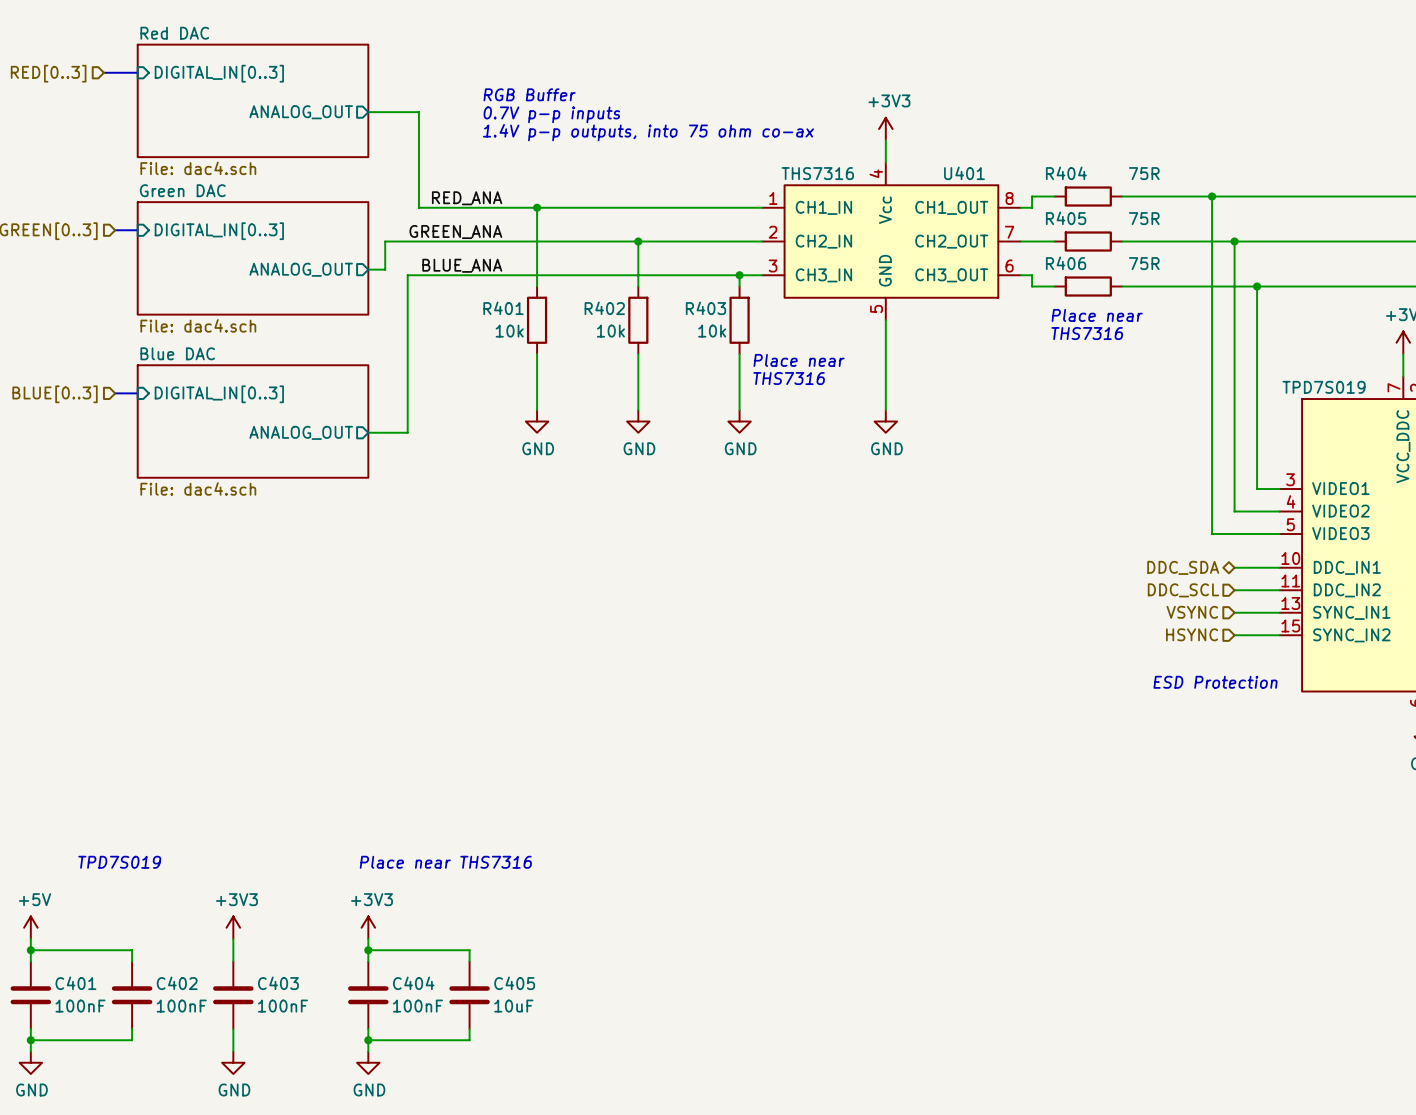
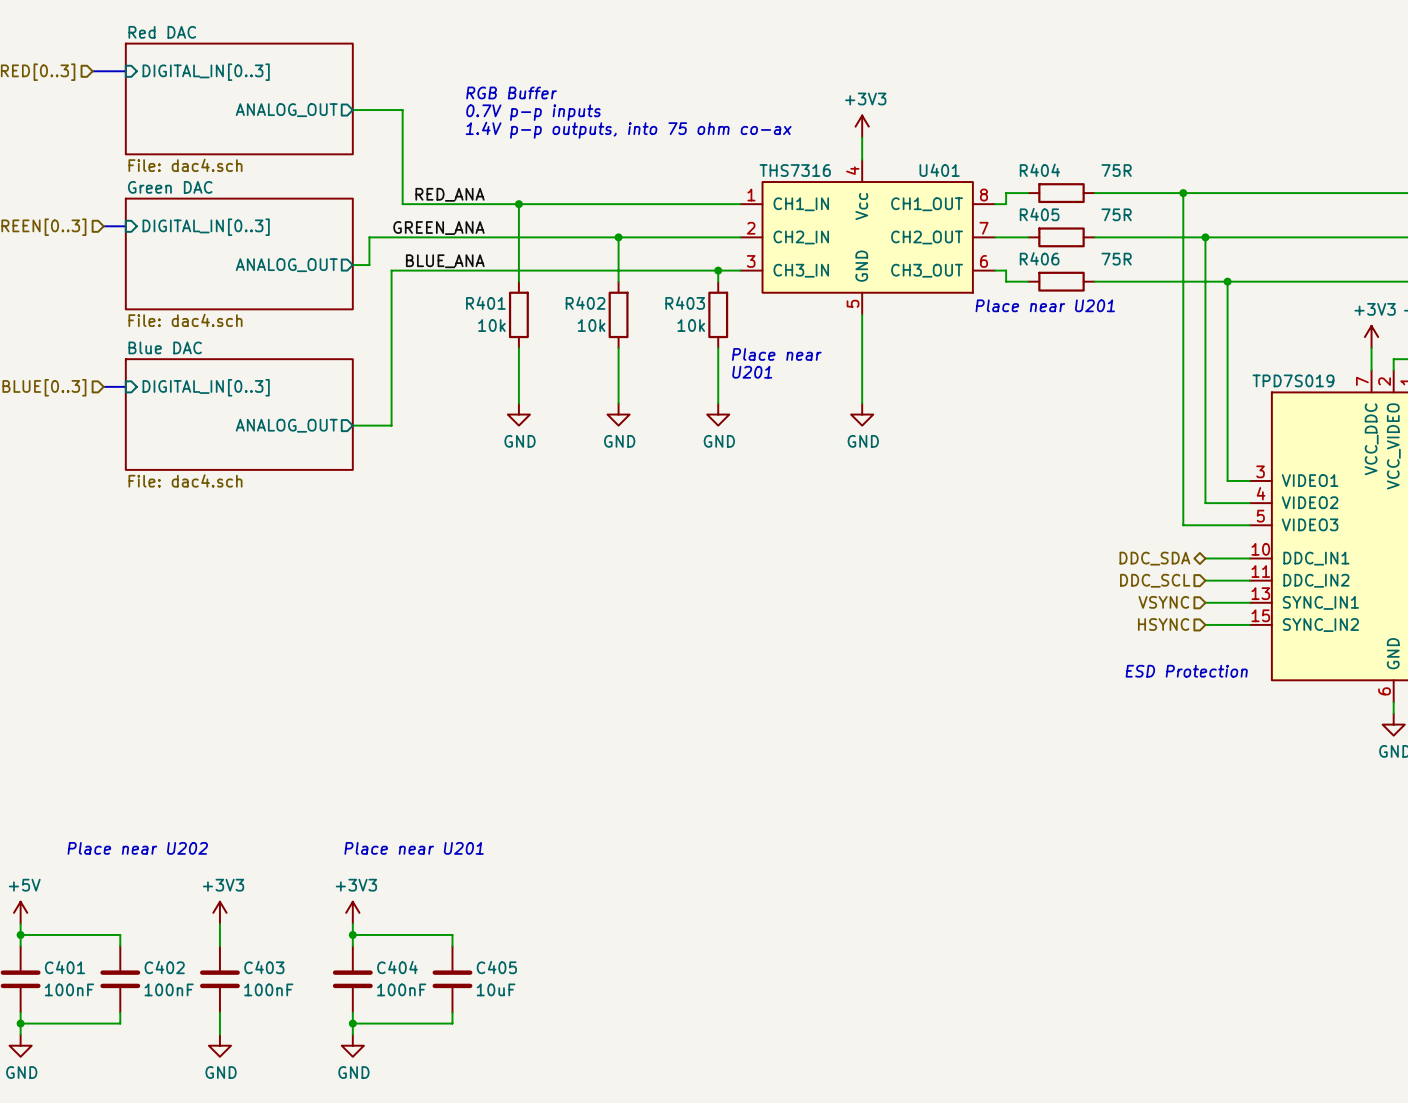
text: Place near (1097, 315) -> Place near U201 (1045, 305)
text: THS7316 (1087, 333) -> none
text: THS7316 (789, 378) -> U201 (752, 372)
text: TPD7S019 (119, 862) -> Place near U202 (137, 848)
text: Place near THS7316 (445, 862) -> Place near U201 (414, 848)

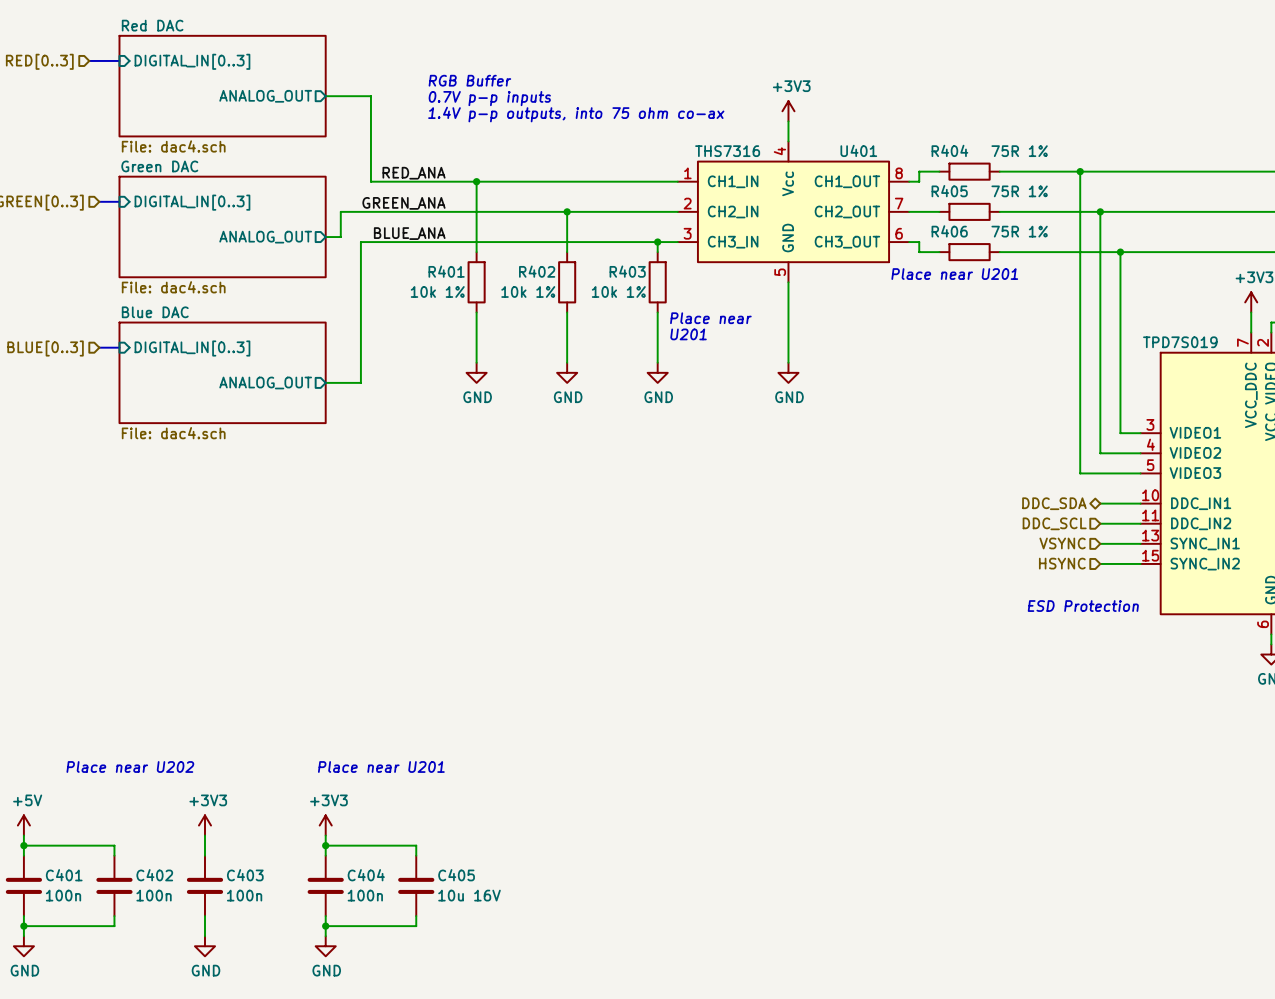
R404 value: 75R (1116, 170) -> 75R 1% (1019, 151)
R405 value: 75R (1116, 214) -> 75R 1% (1019, 191)
R406 value: 75R (1116, 259) -> 75R 1% (1019, 231)
R401 value: 10k (491, 325) -> 10k 1% (437, 291)
R402 value: 10k (591, 325) -> 10k 1% (528, 291)
R403 value: 10k (691, 325) -> 10k 1% (618, 291)
C401 value: 100nF (69, 989) -> 100n (63, 895)
C402 value: 100nF (169, 989) -> 100n (154, 895)
C403 value: 100nF (268, 989) -> 100n (244, 895)
C404 value: 100nF (401, 989) -> 100n (365, 895)
C405 value: 10uF (496, 989) -> 10u 16V (469, 895)

